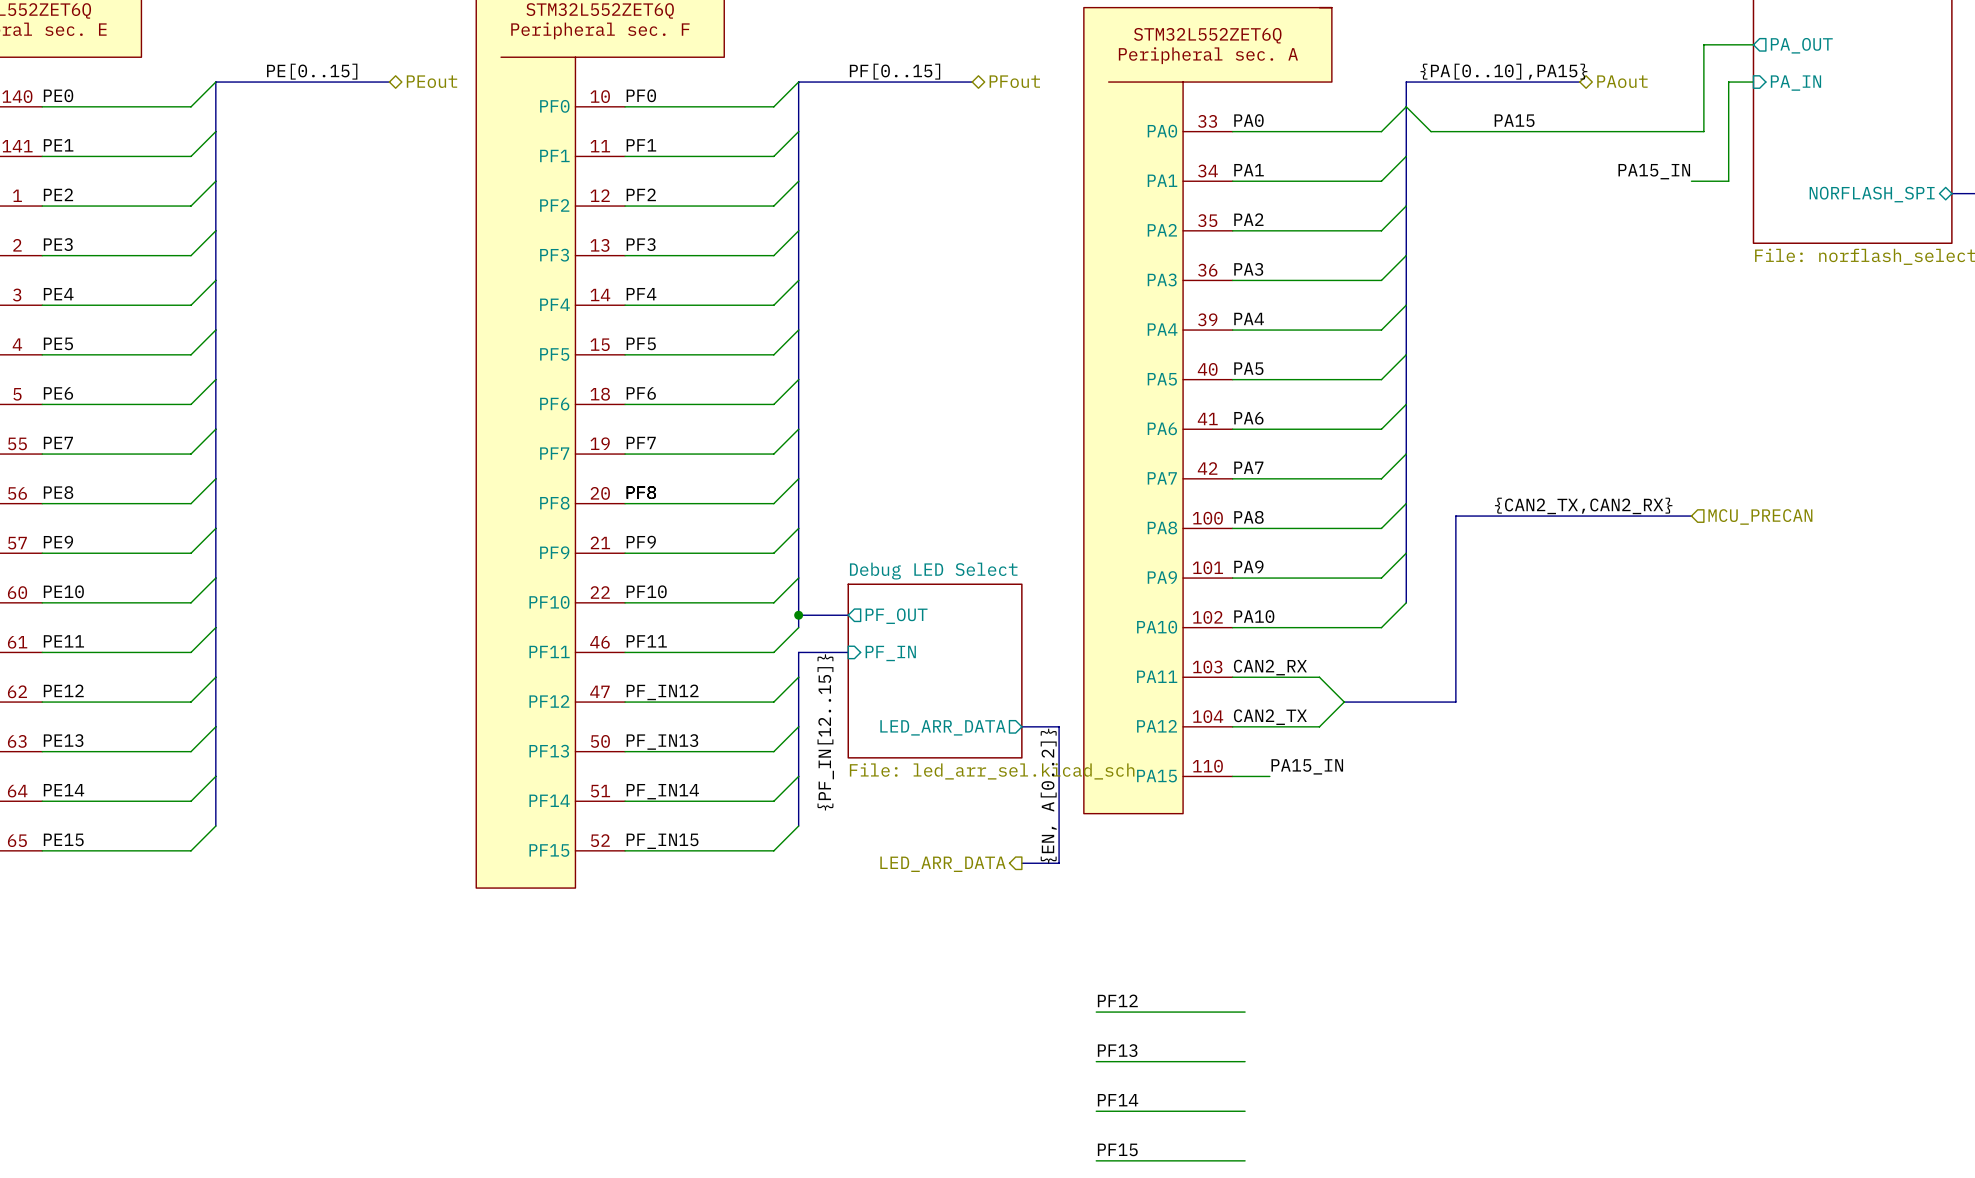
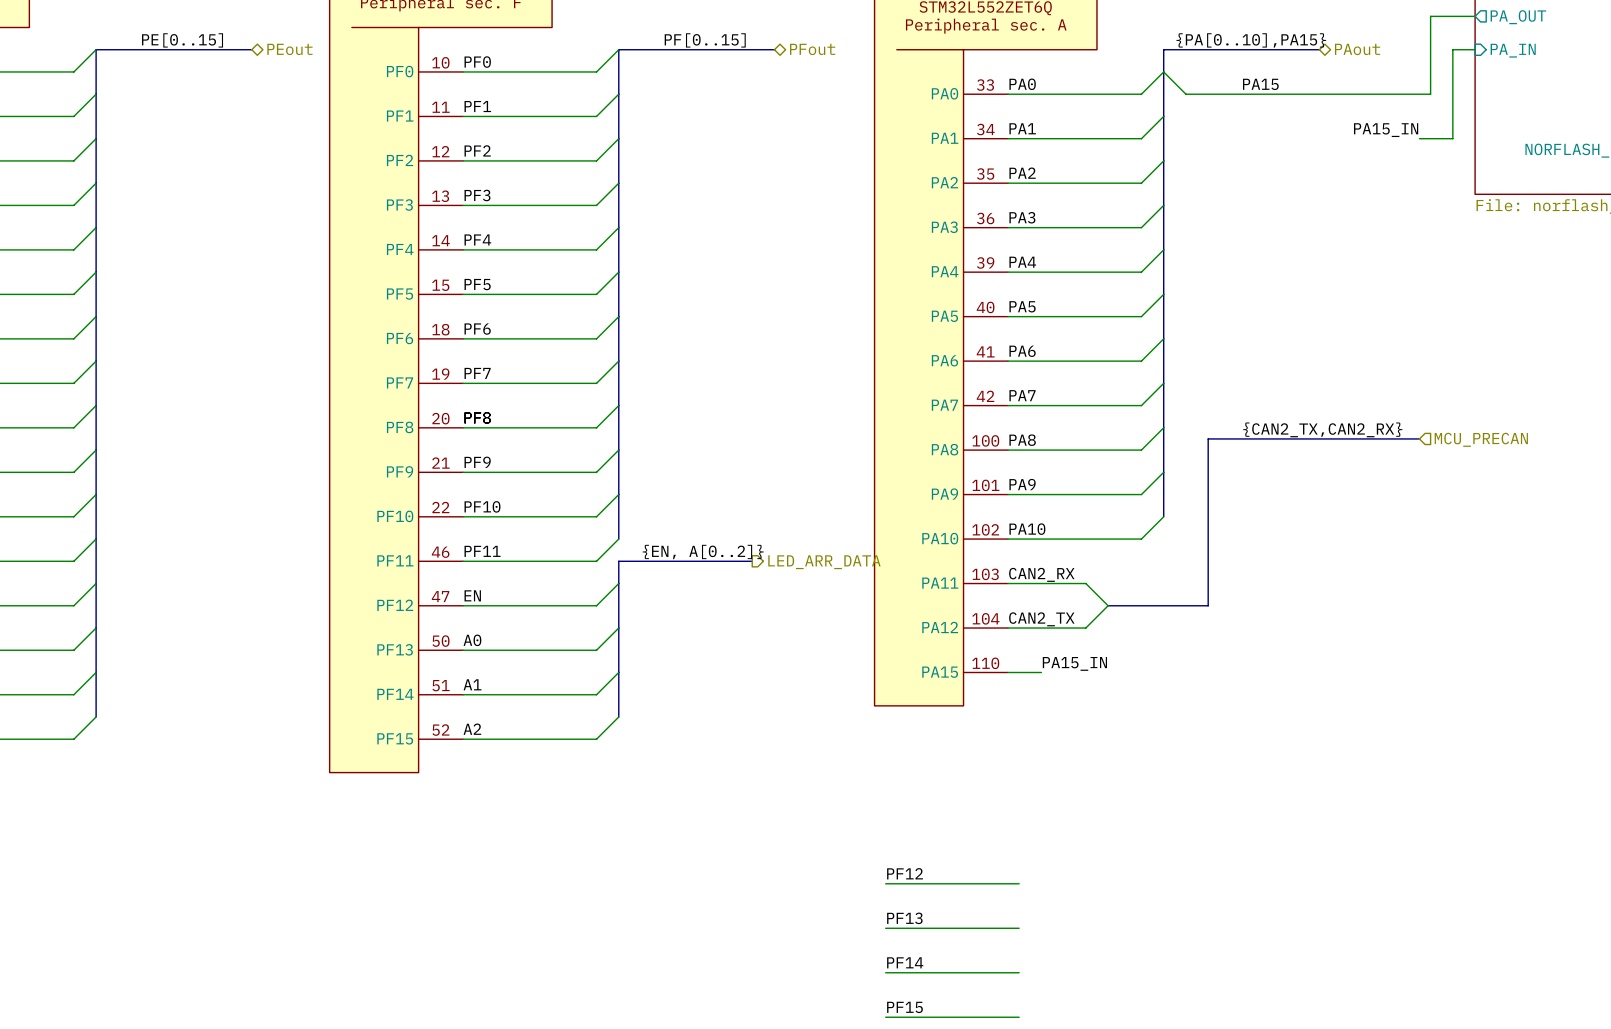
bus: (798, 615) (848, 615) -> none
junction: (798, 615) -> none
sheet pin: PF_OUT (896, 616) -> none
bus: none -> (663, 561) (752, 561)
sheet pin: PF_IN (890, 653) -> none
sheet Debug LED Select: File: led_arr_sel.kicad_sch (935, 671) -> none
label: PF_IN12 (662, 692) -> EN (472, 595)
bus: (1021, 726) (1059, 726) (1059, 863) (1021, 863) -> none
sheet pin: LED_ARR_DATA (942, 727) -> none
label: {PF_IN[12..15]} (825, 732) -> {EN, A[0..2]} (703, 551)
label: PF_IN13 (662, 741) -> A0 (472, 640)
label: PF_IN14 (662, 791) -> A1 (472, 684)
label: {EN, A[0..2]} (1048, 796) -> none
label: PF_IN15 (662, 841) -> A2 (472, 729)
hierarchical label rotation: 0° (942, 864) -> 180° (824, 562)
hierarchical label position: LED_ARR_DATA (942, 864) -> LED_ARR_DATA (824, 562)

